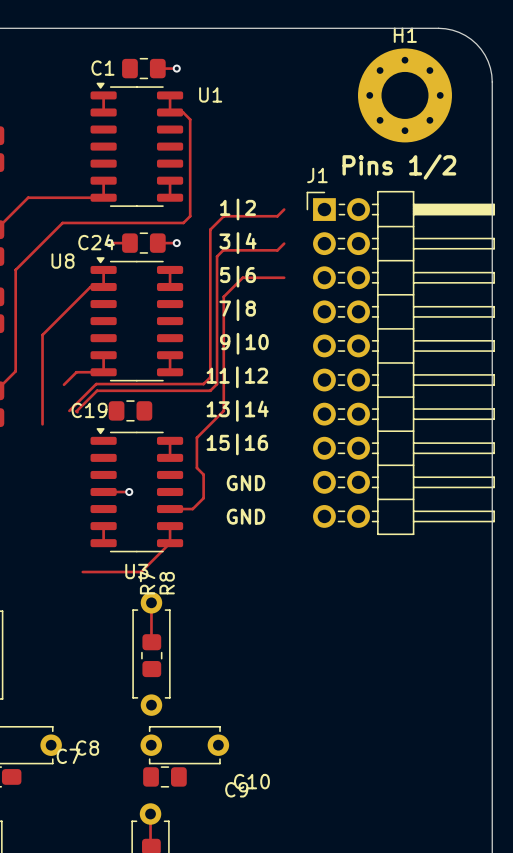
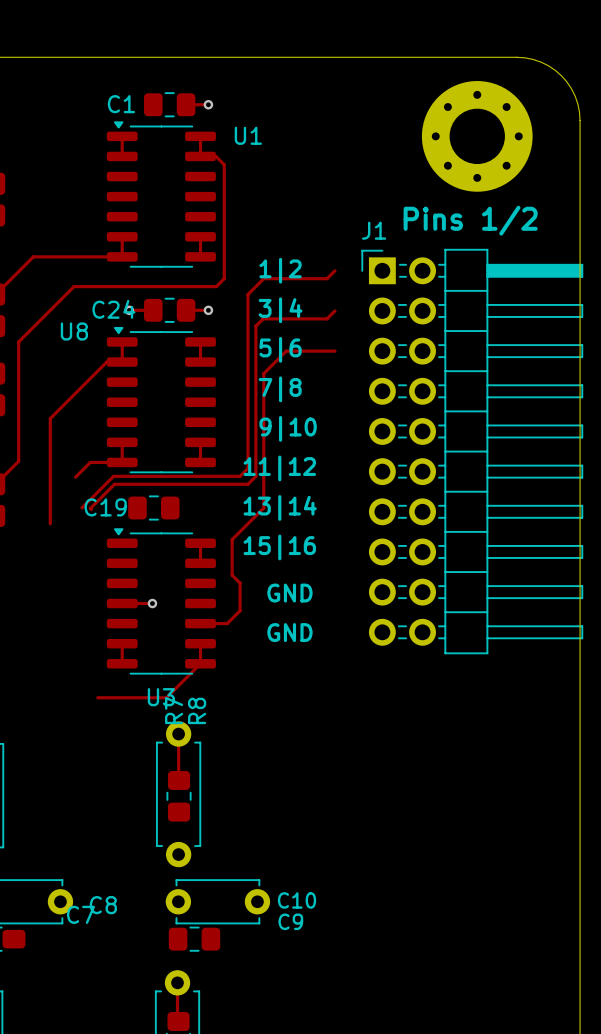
H1 name: H1 (405, 35) -> none
C10 name position: C10 (251, 781) -> C10 (296, 900)
C9 name position: C9 (236, 789) -> C9 (290, 921)

